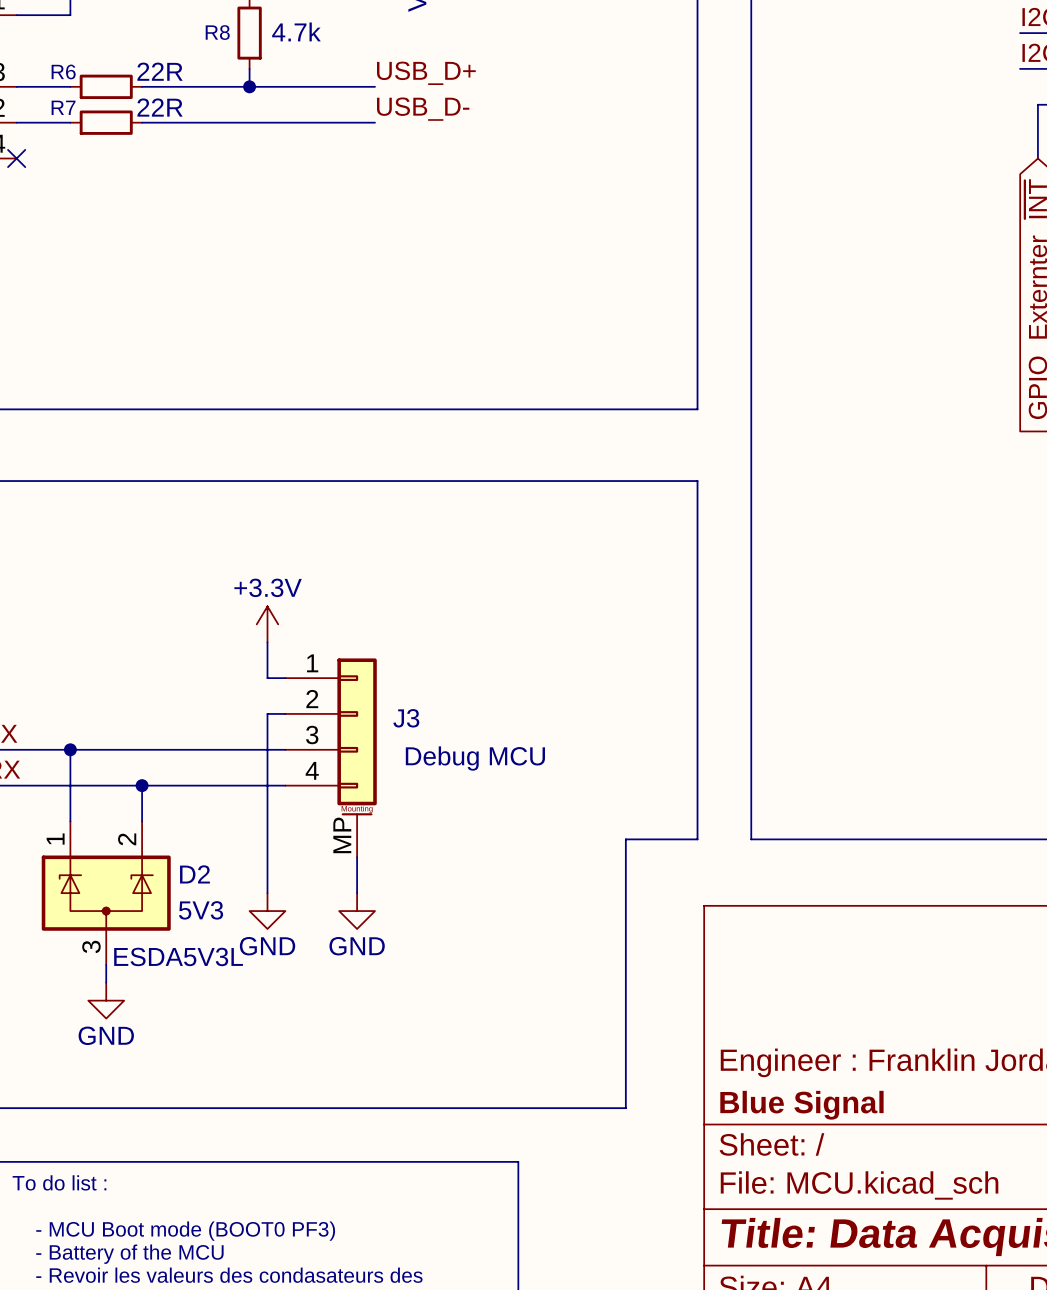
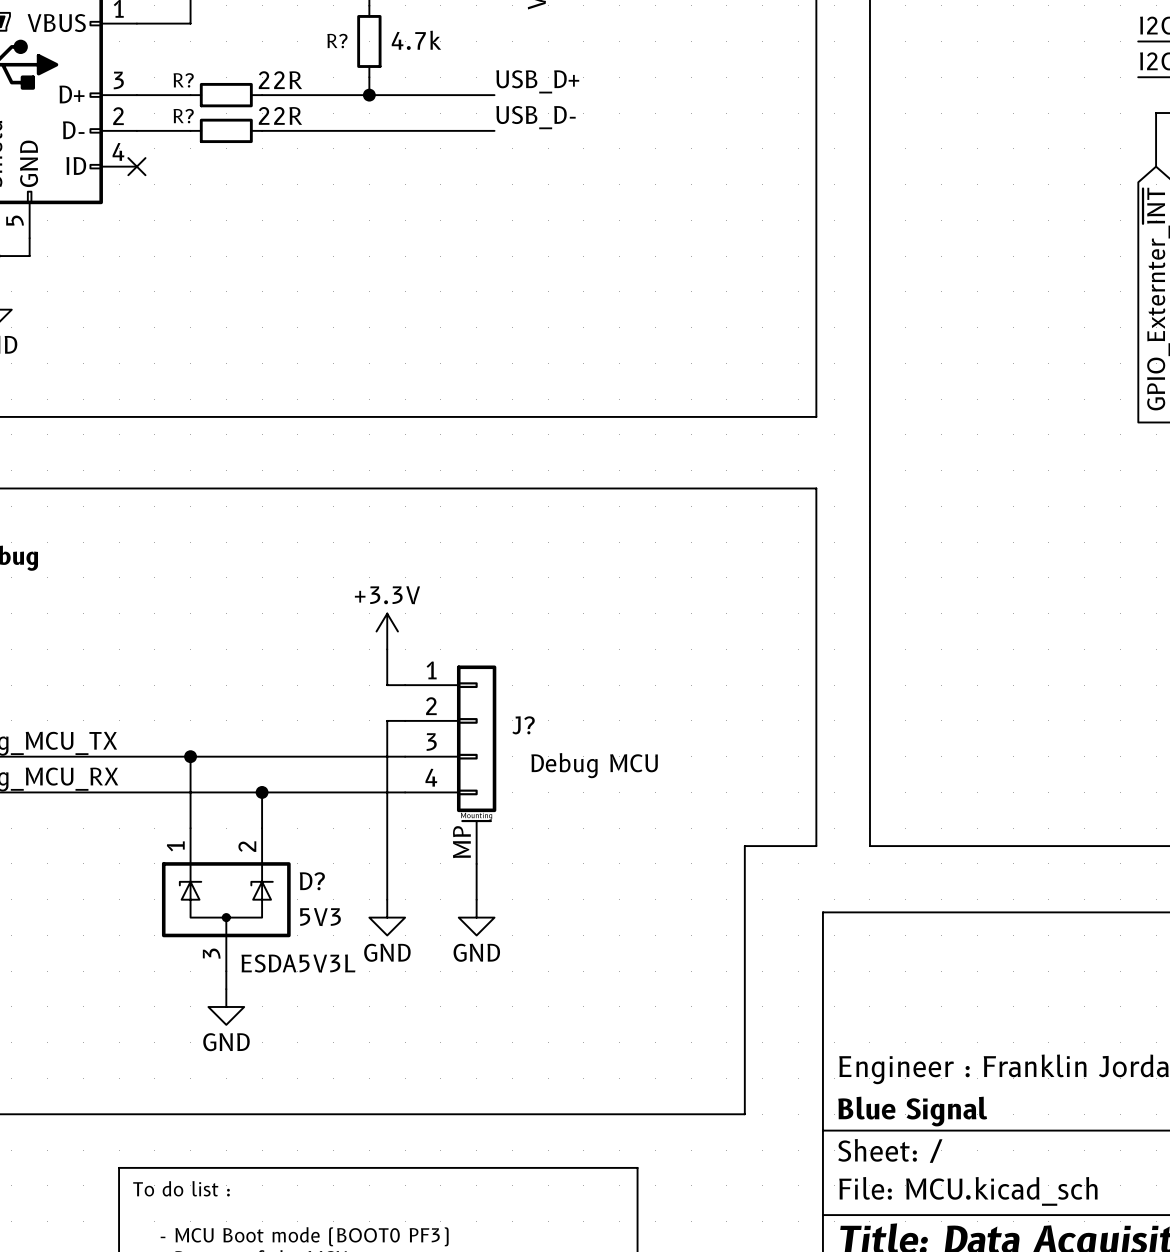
R8 name: R8 (217, 32) -> R? (337, 41)
R6 name: R6 (63, 71) -> R? (183, 80)
R7 name: R7 (63, 107) -> R? (183, 116)
J3 name: J3 (406, 718) -> J? (523, 725)
D2 name: D2 (194, 874) -> D? (312, 881)

